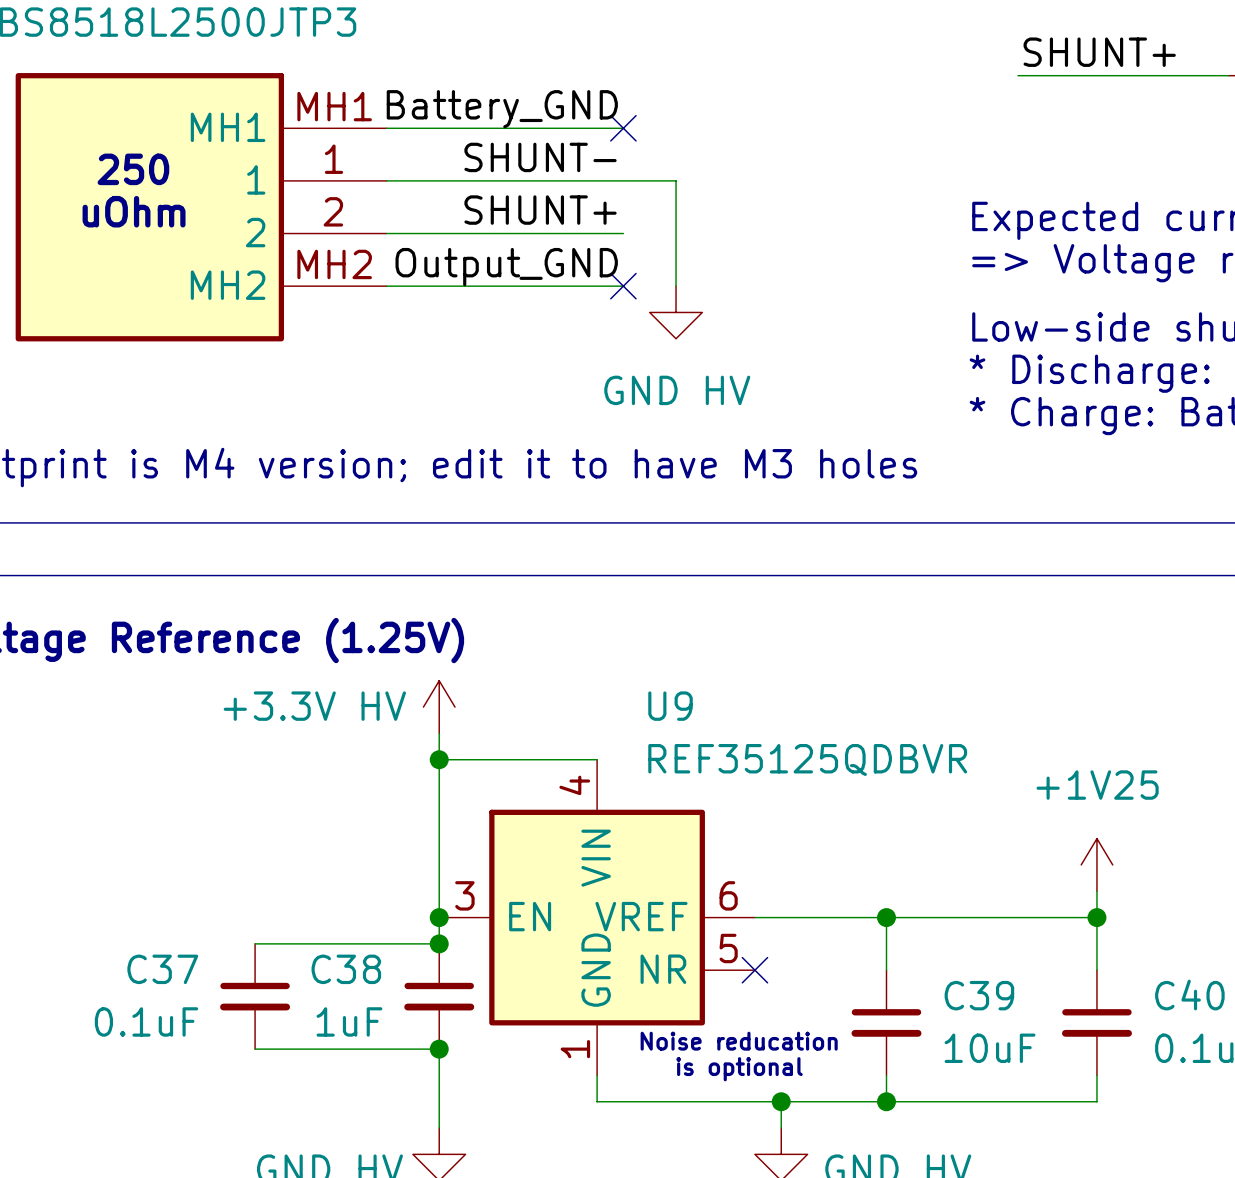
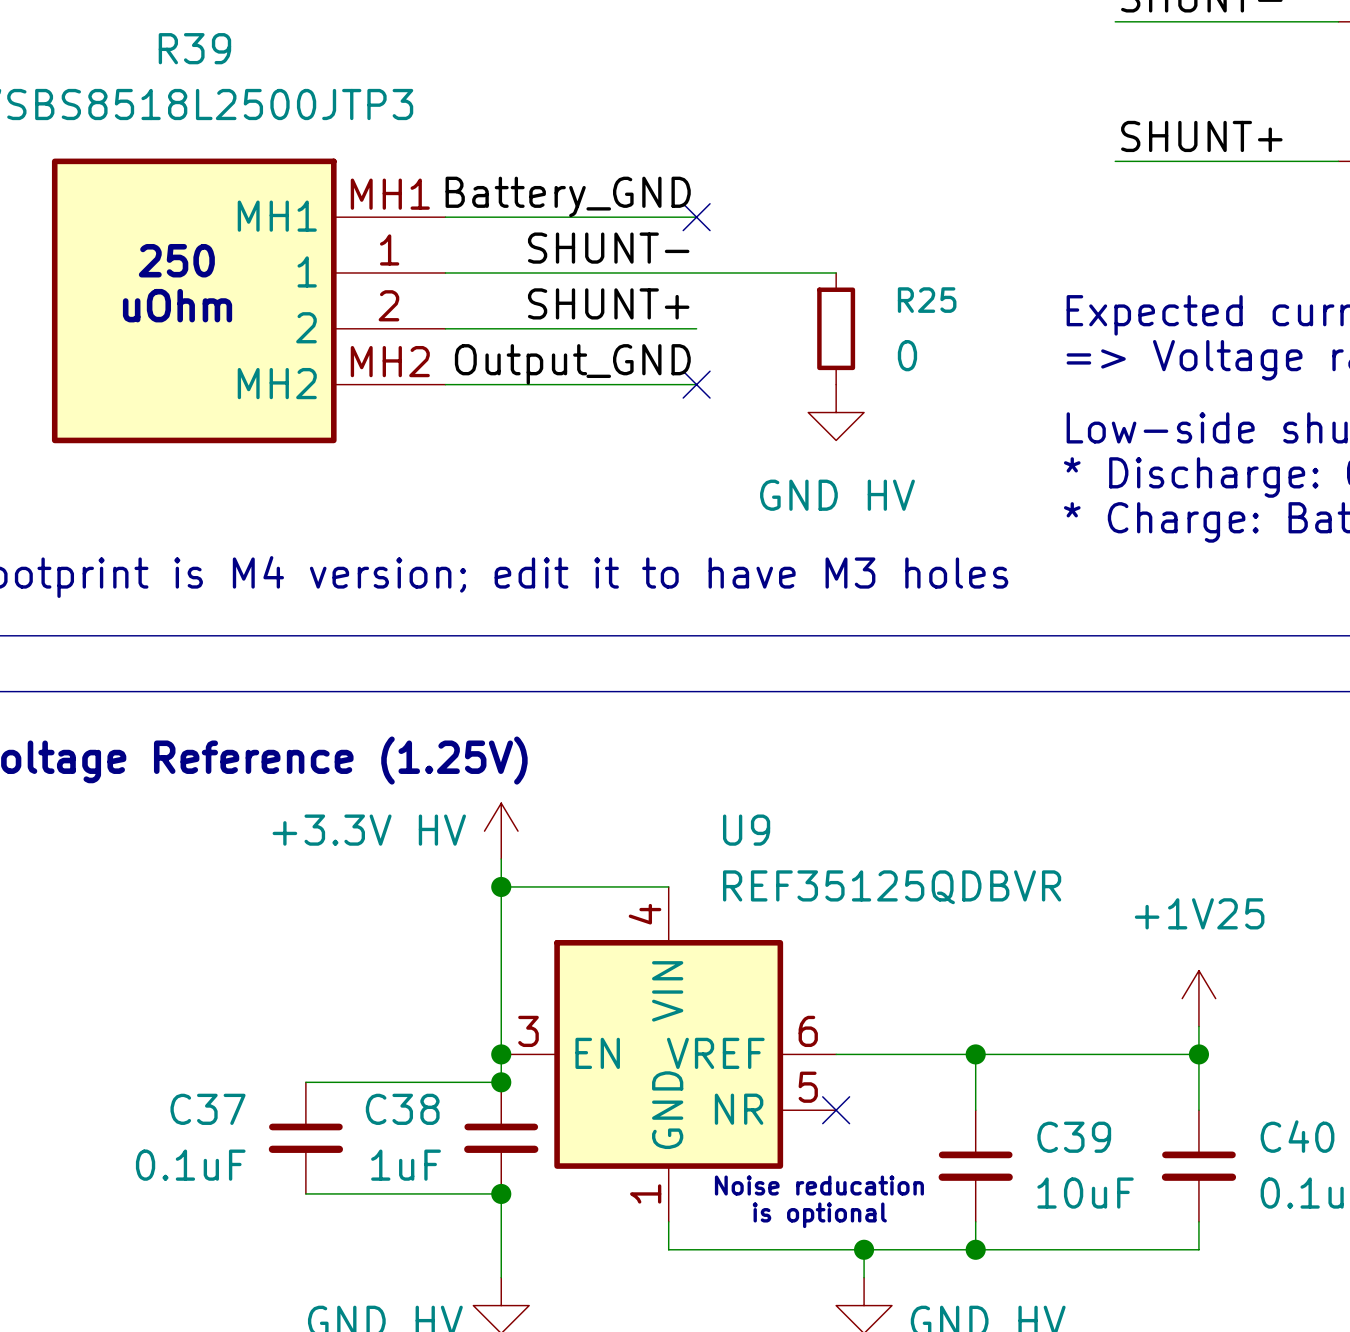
wire: (676, 180) (676, 286) -> (752, 272) (836, 272)
R25: none -> 0 (836, 328)
power symbol position: GND HV (676, 312) -> GND HV (836, 412)

